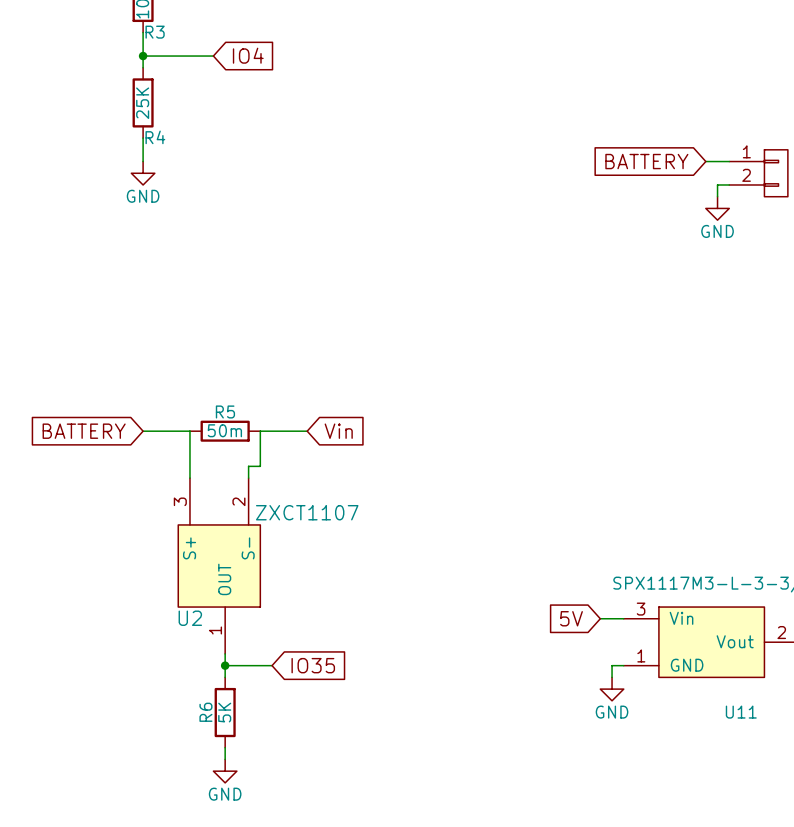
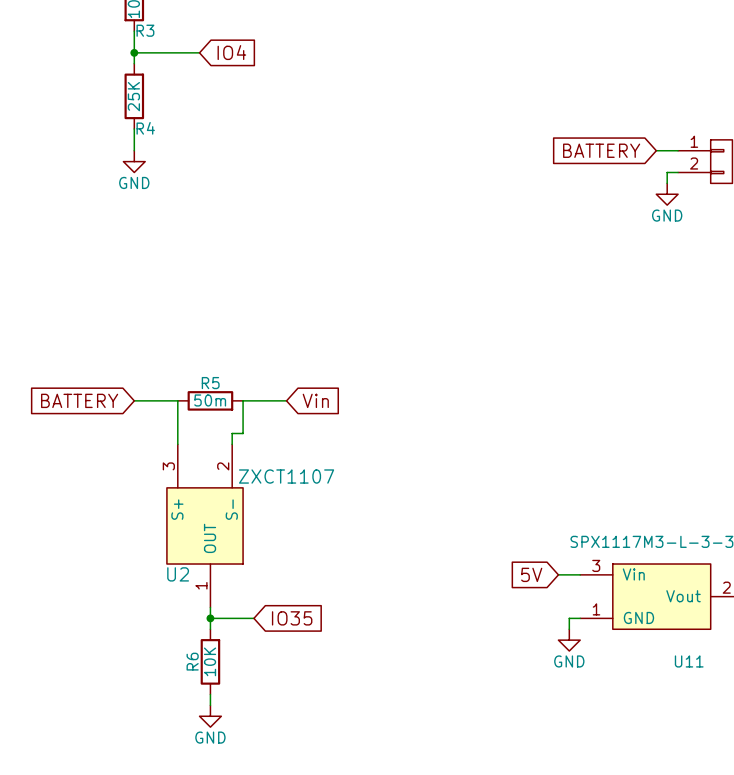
R6 value: 5K (224, 712) -> 10K (210, 661)

